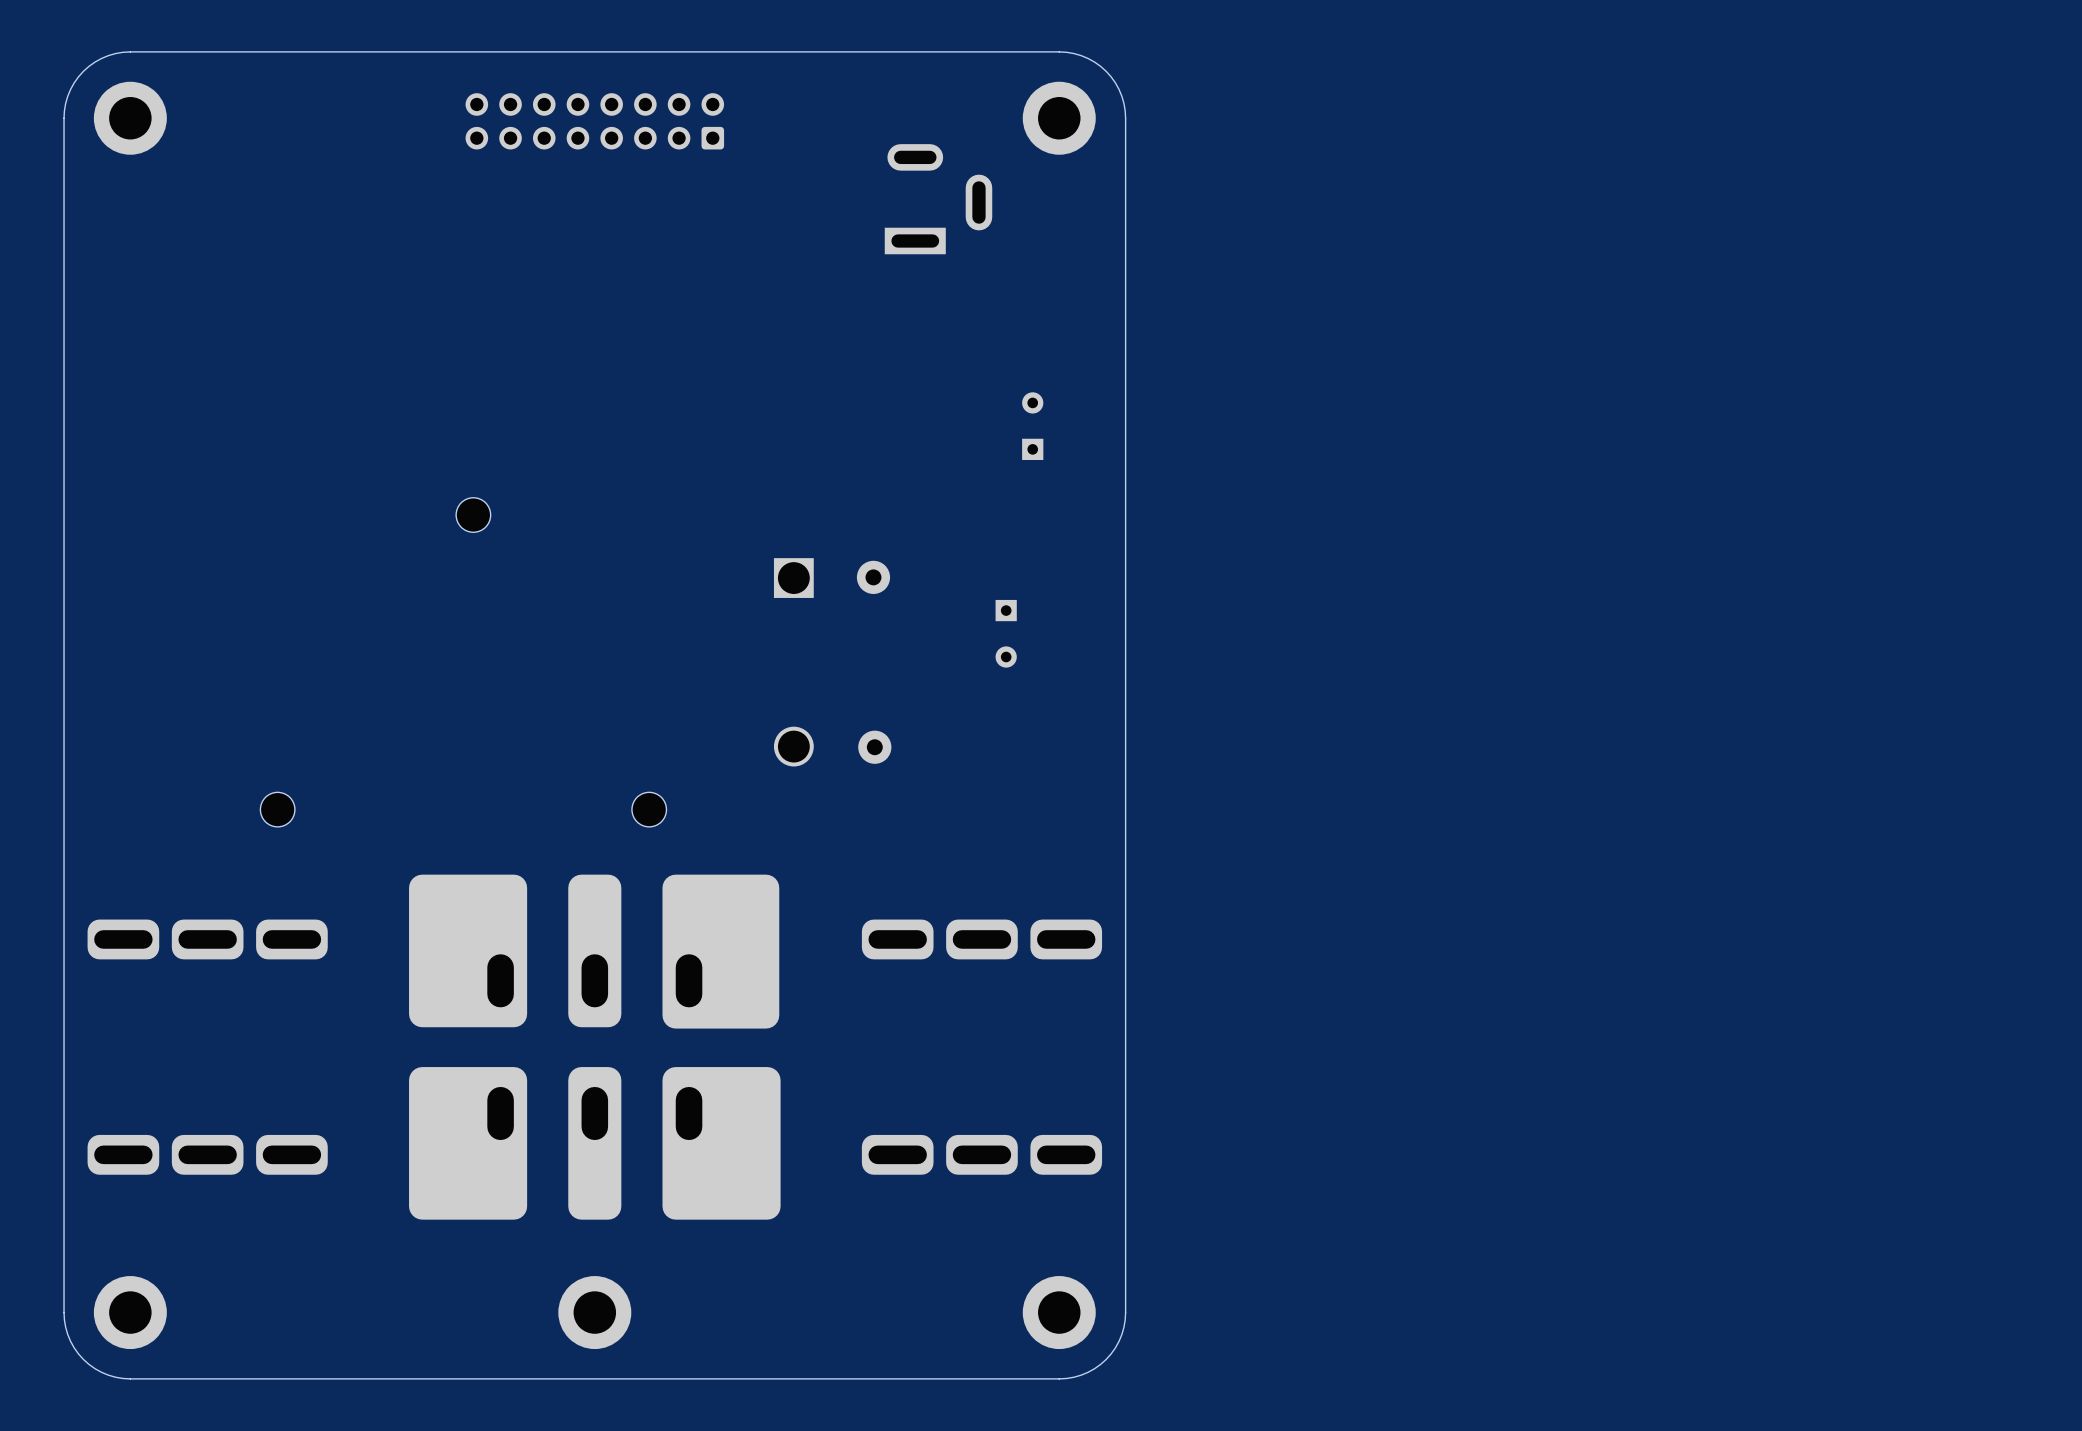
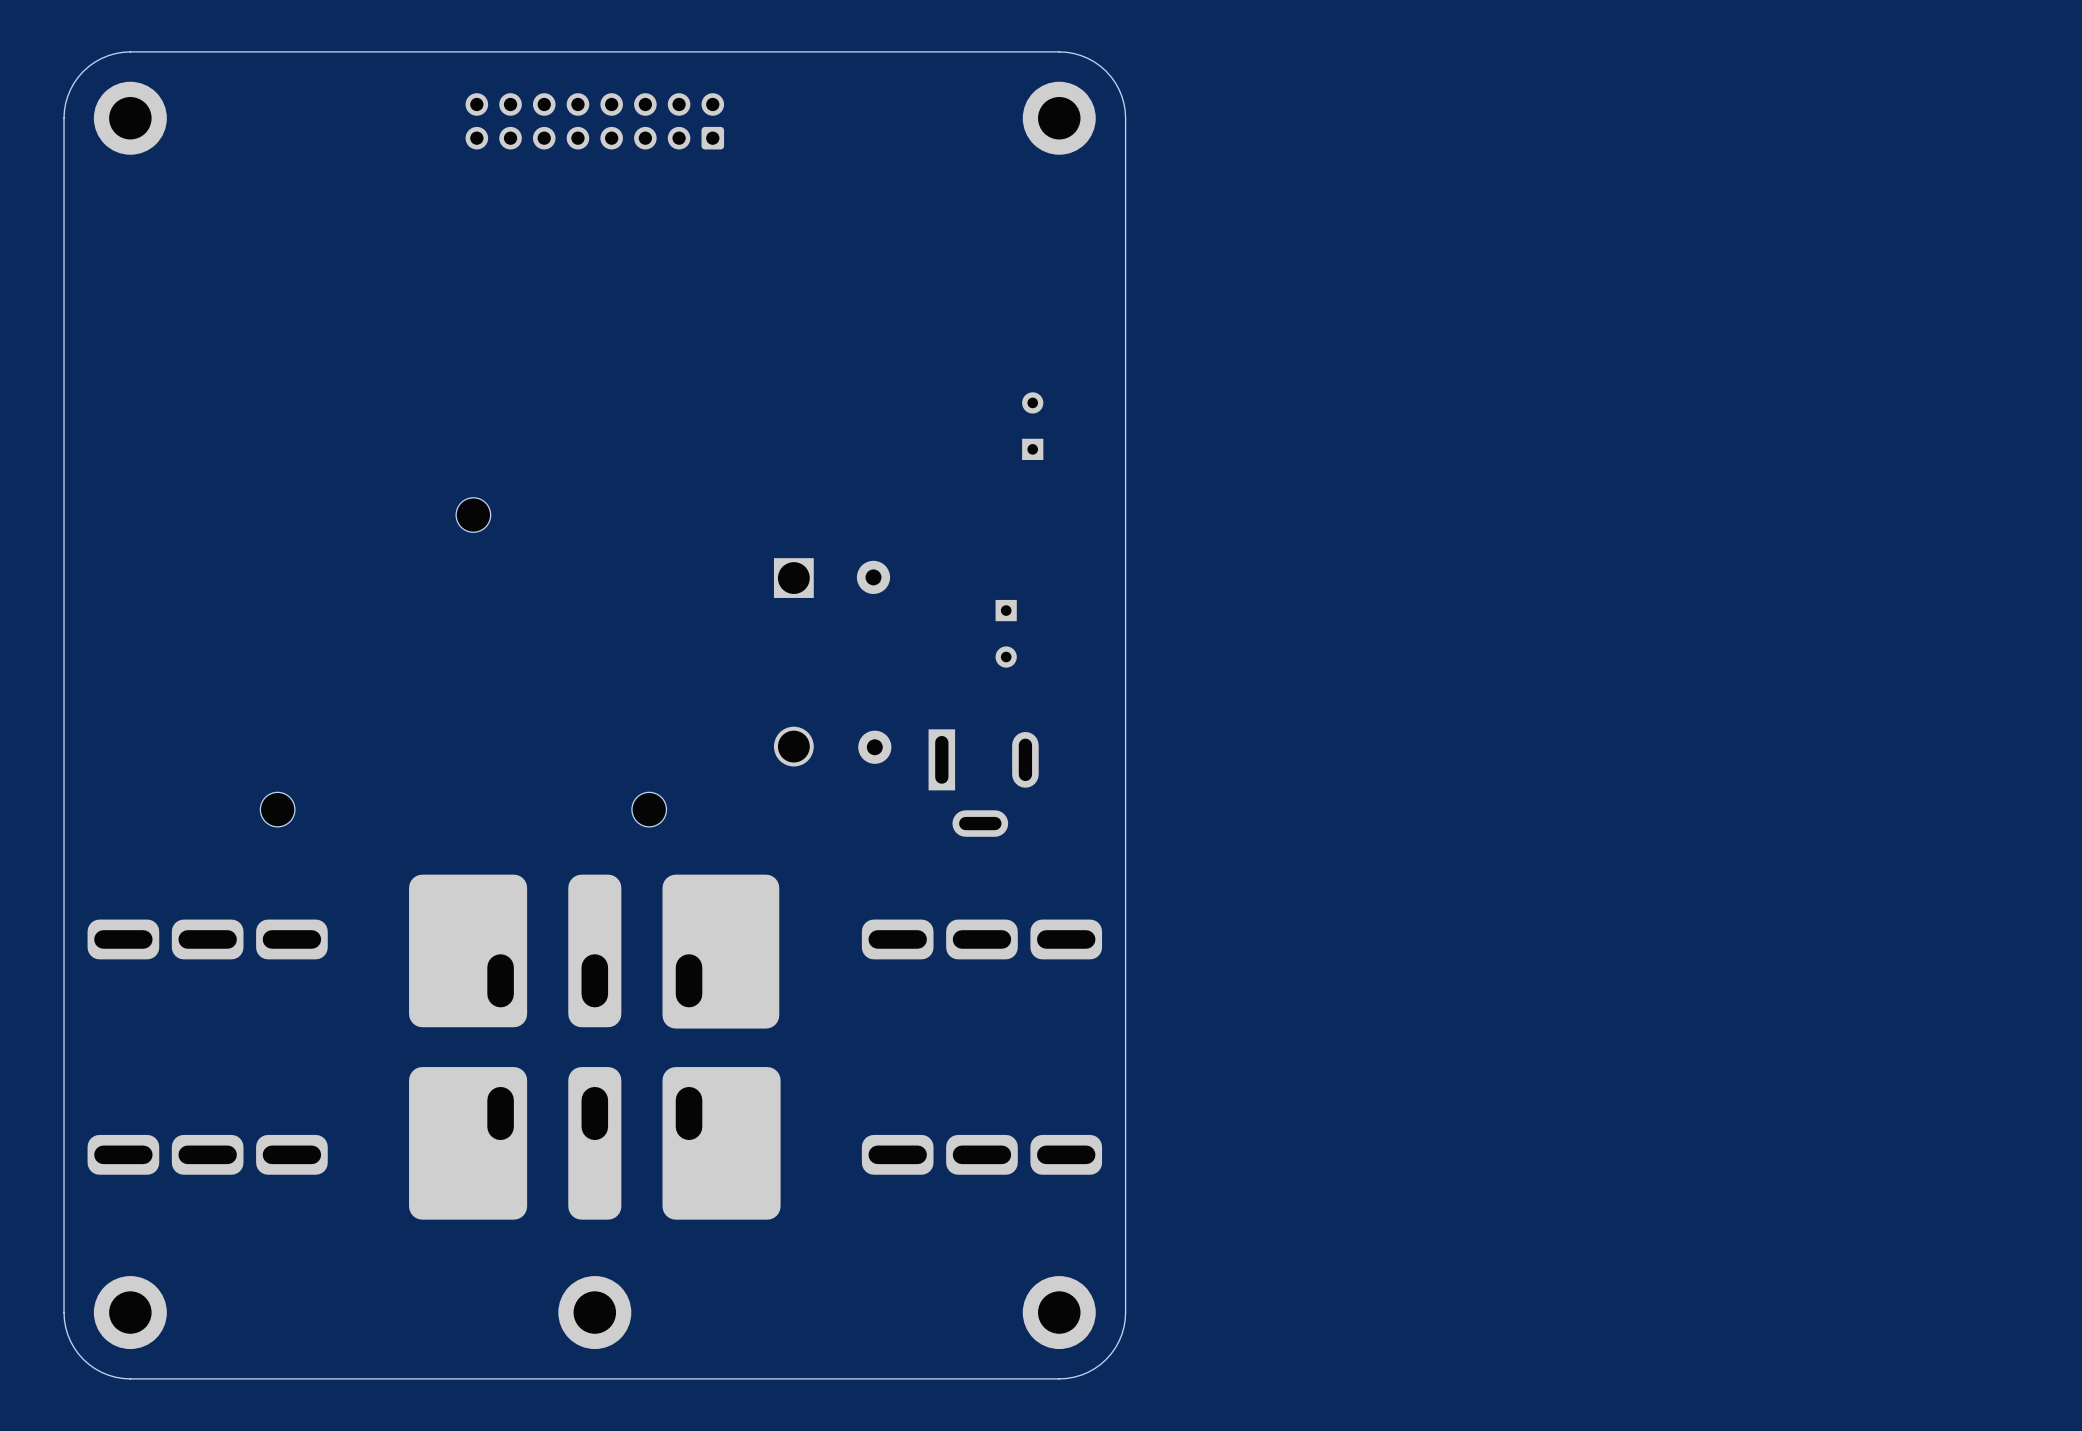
part: (938, 199) -> none
part: none -> (983, 783)

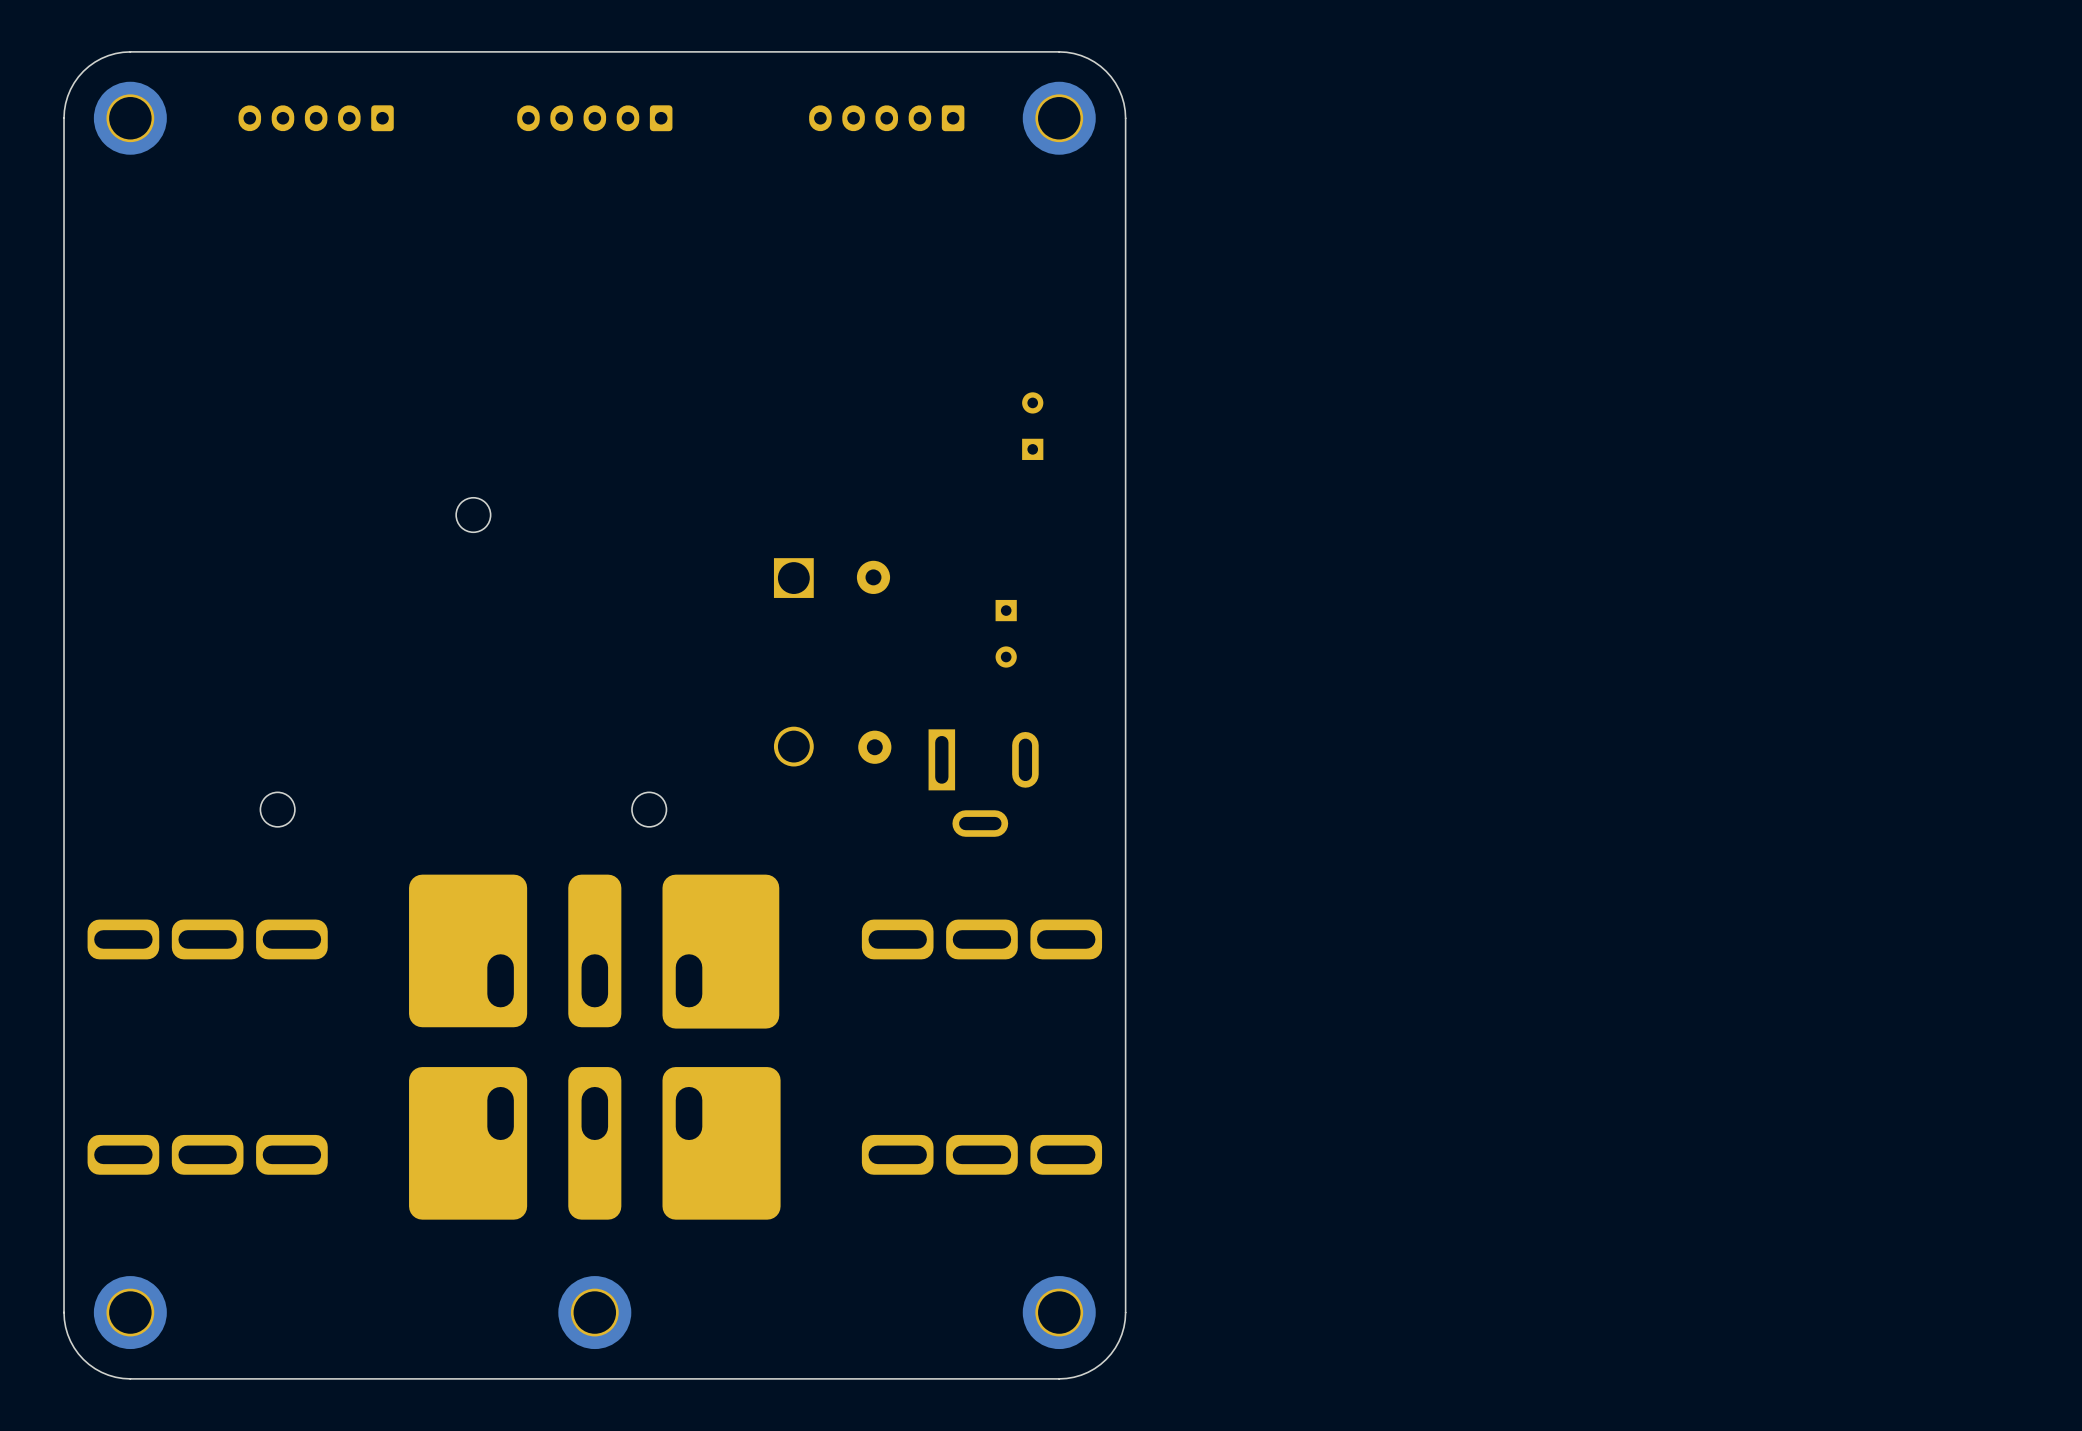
part footprint: [465, 93, 725, 150] -> [517, 105, 673, 132]
part: none -> (316, 118)
part: none -> (886, 118)

